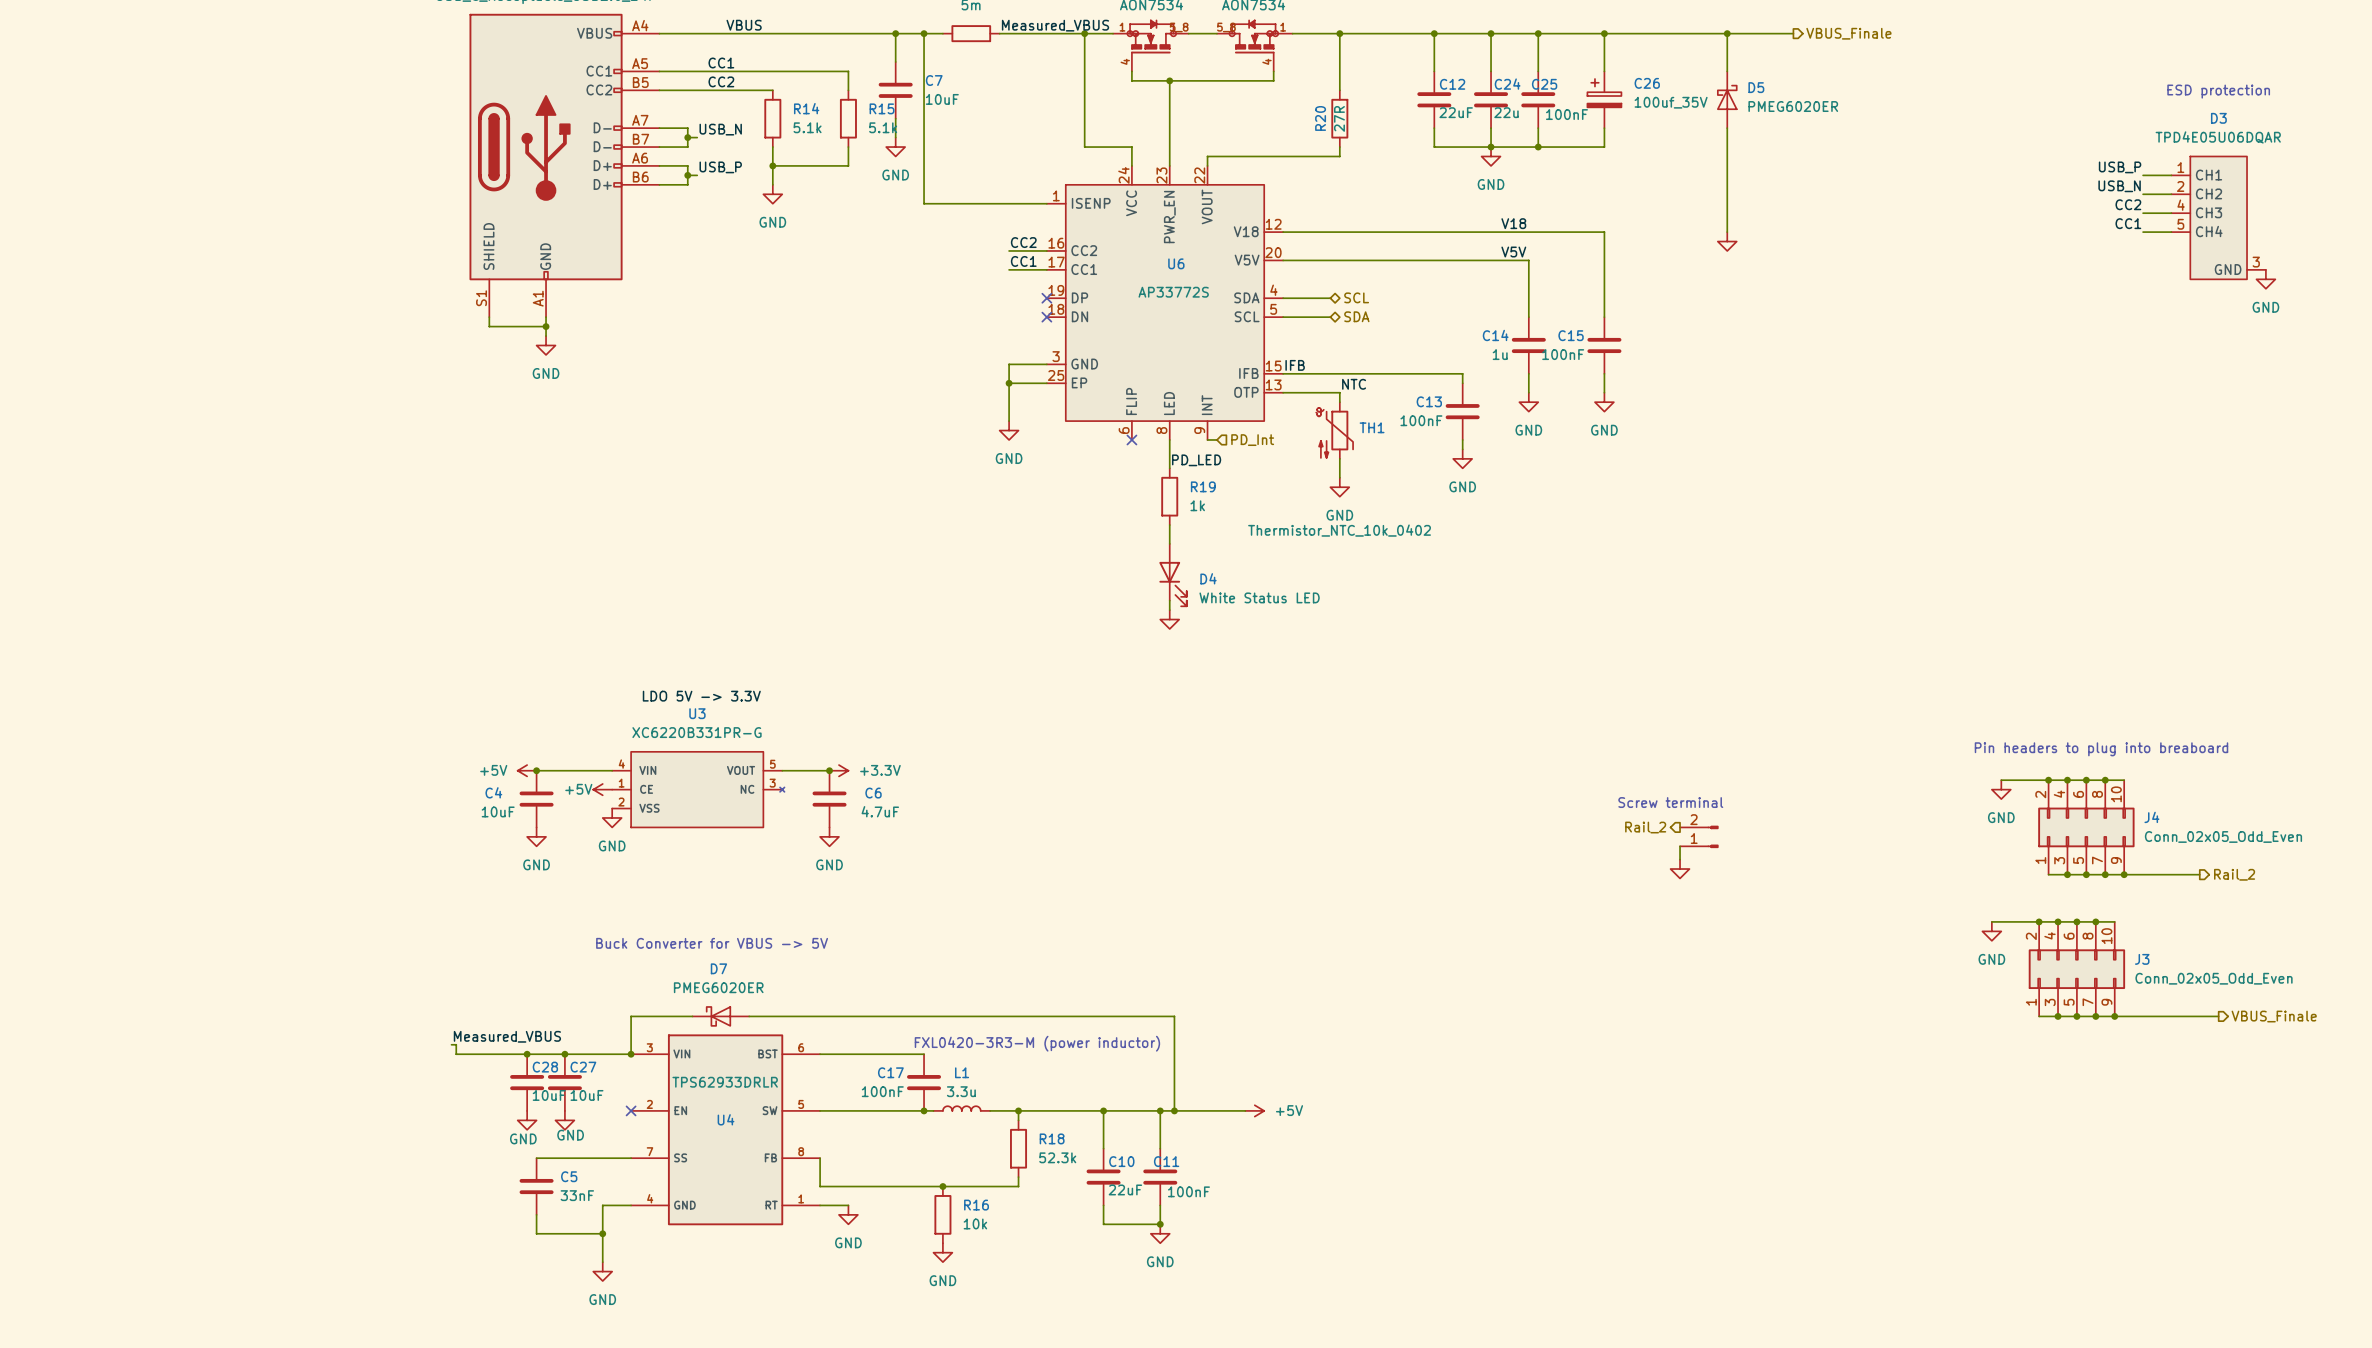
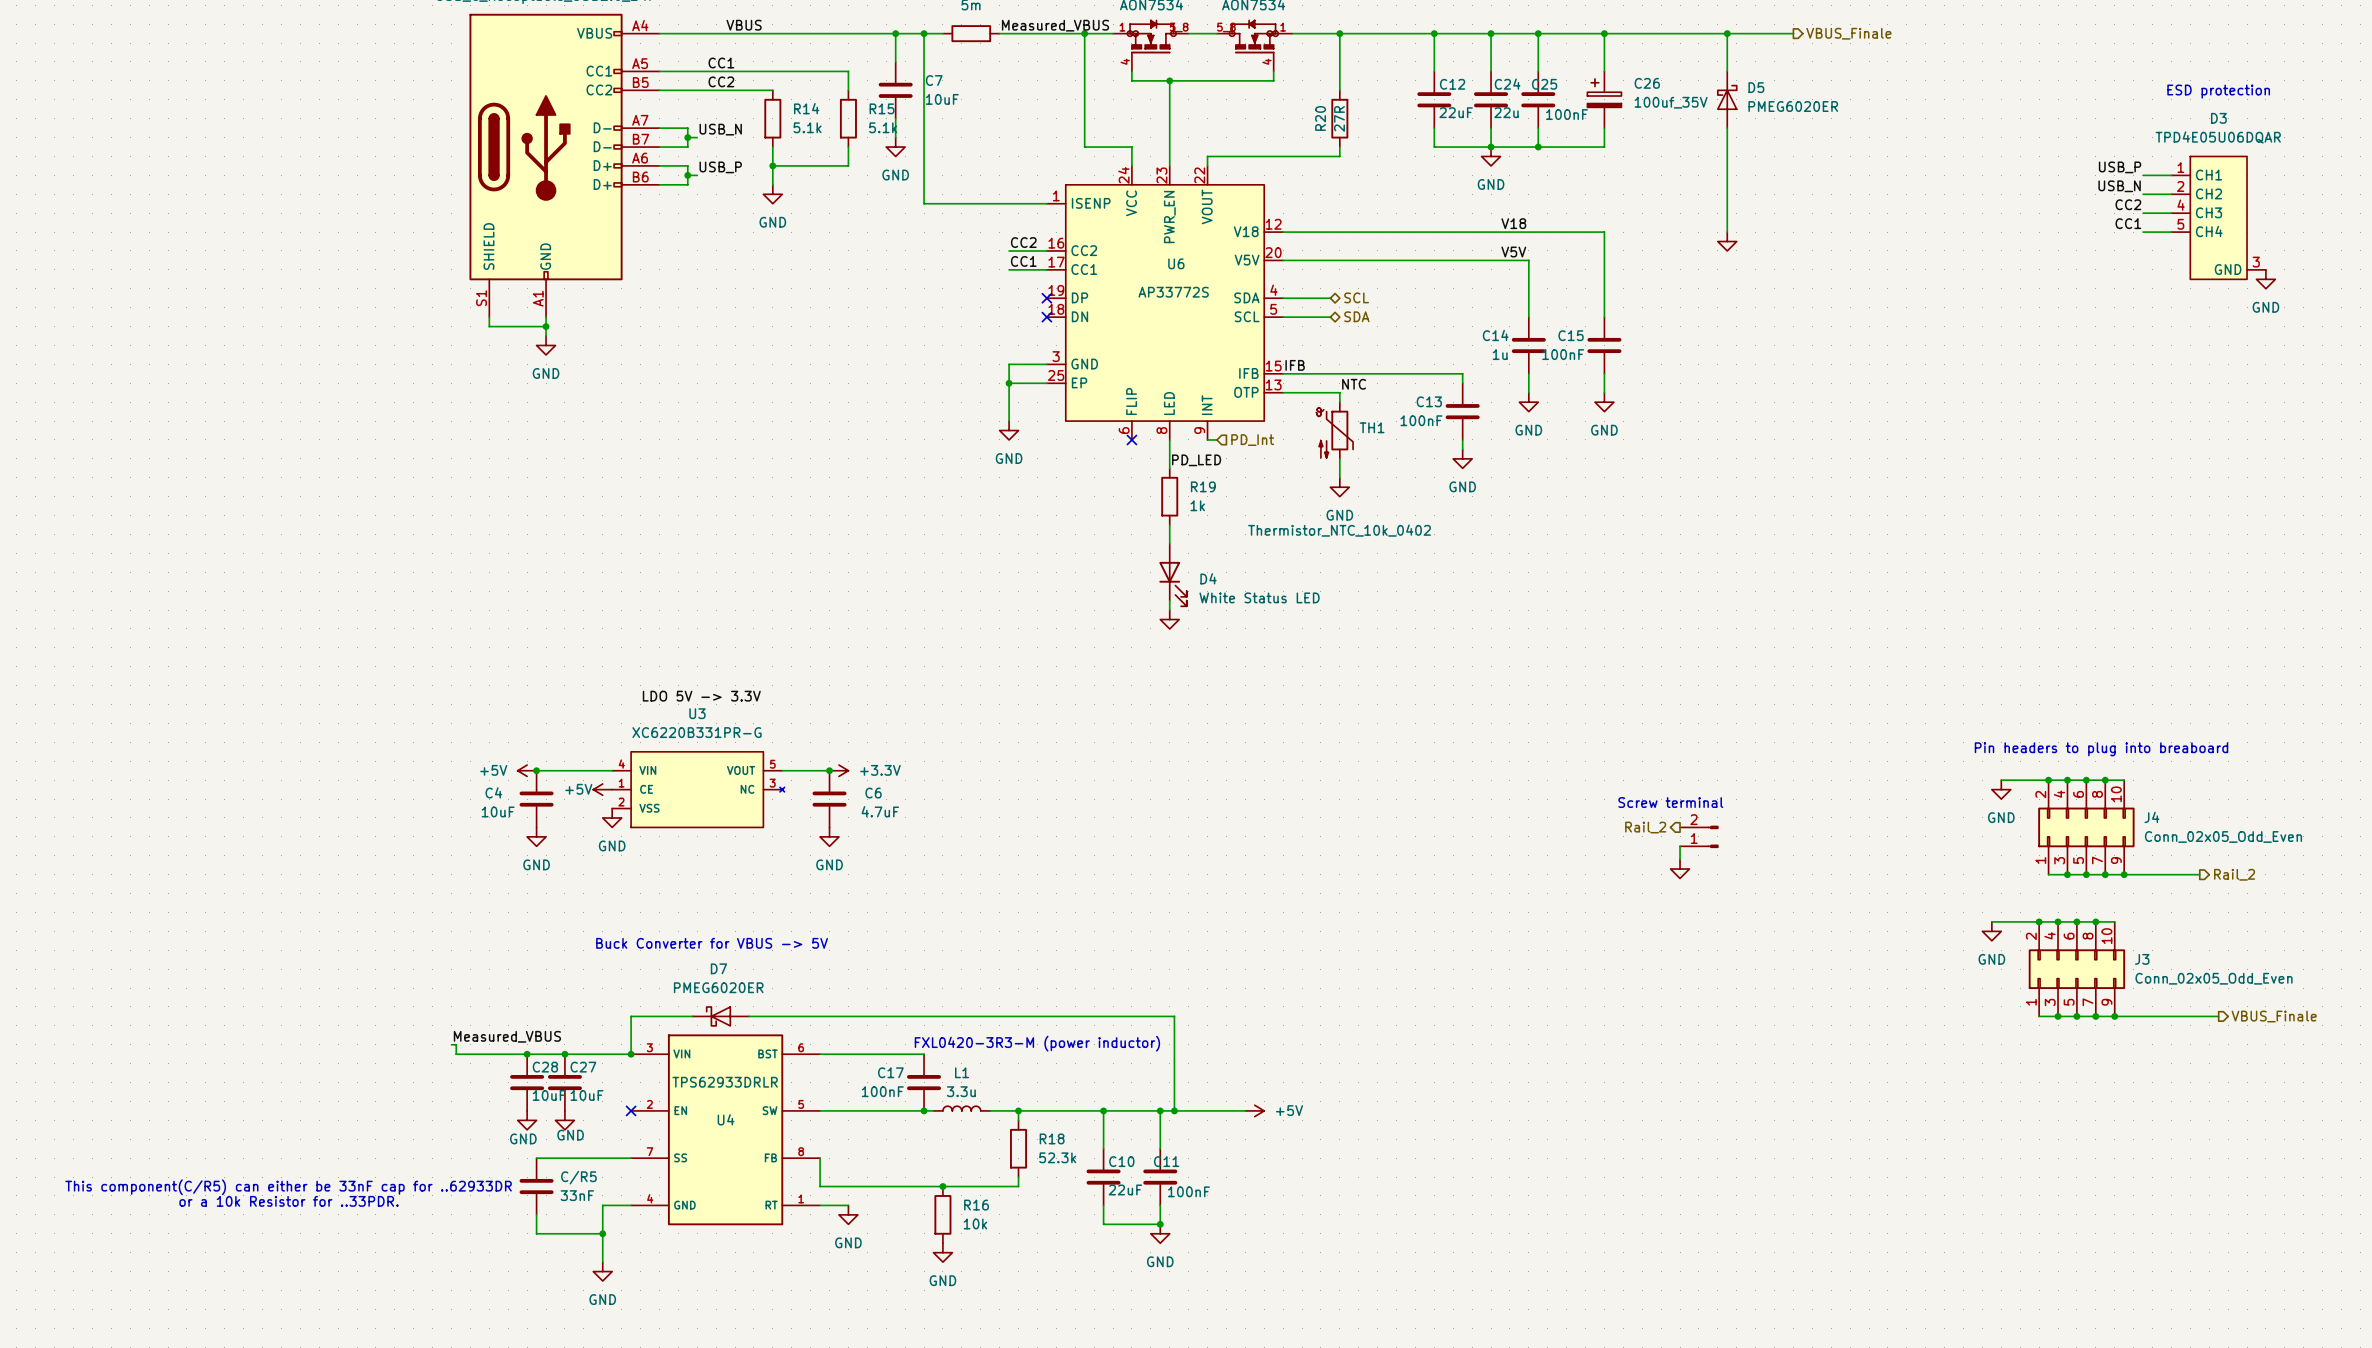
C5 name: C5 (569, 1176) -> C/R5 (578, 1177)
text: none -> This component(C/R5) can either be 33nF cap for ..62933DR (288, 1187)
text: none -> or a 10k Resistor for ..33PDR. (288, 1201)

